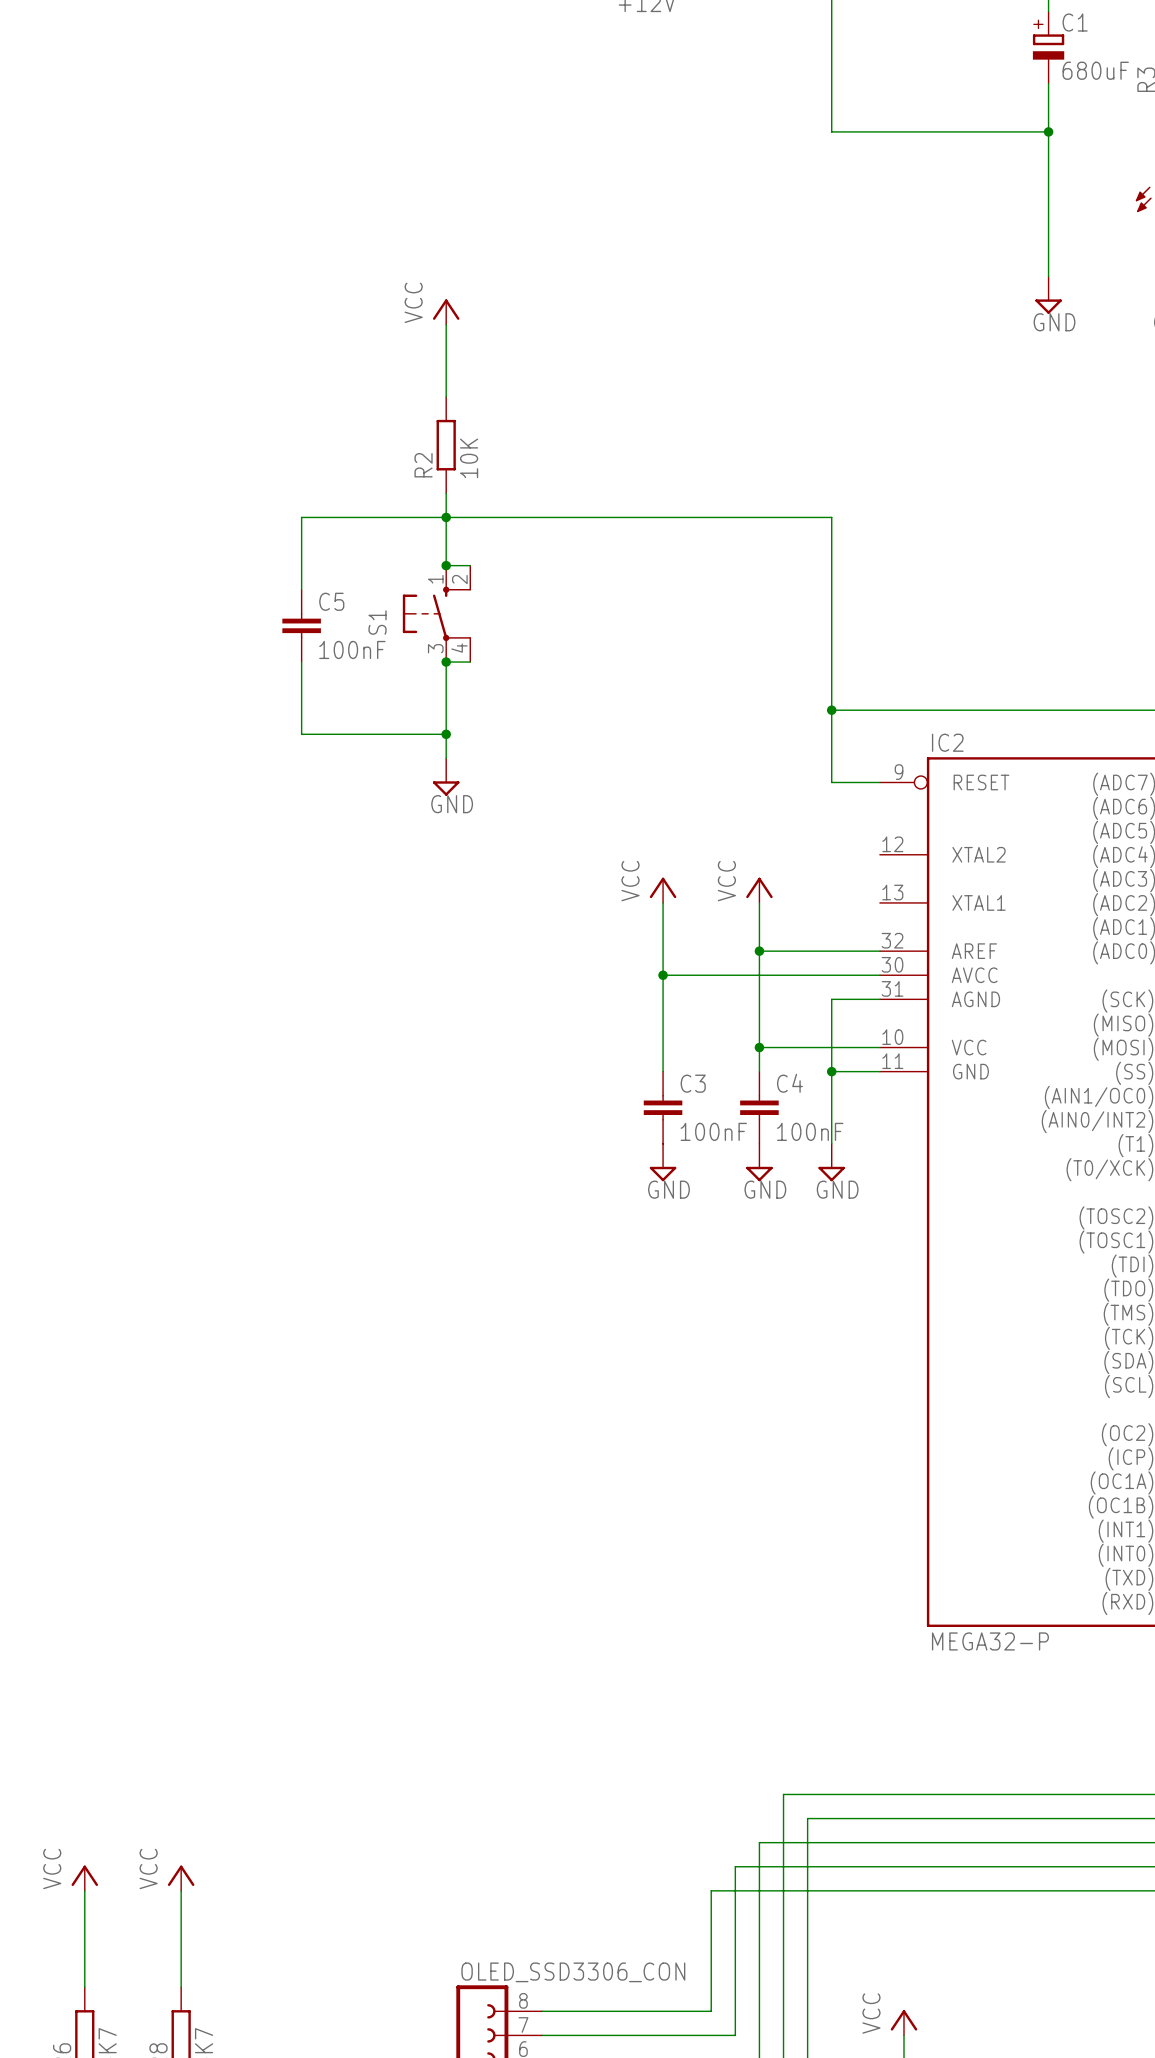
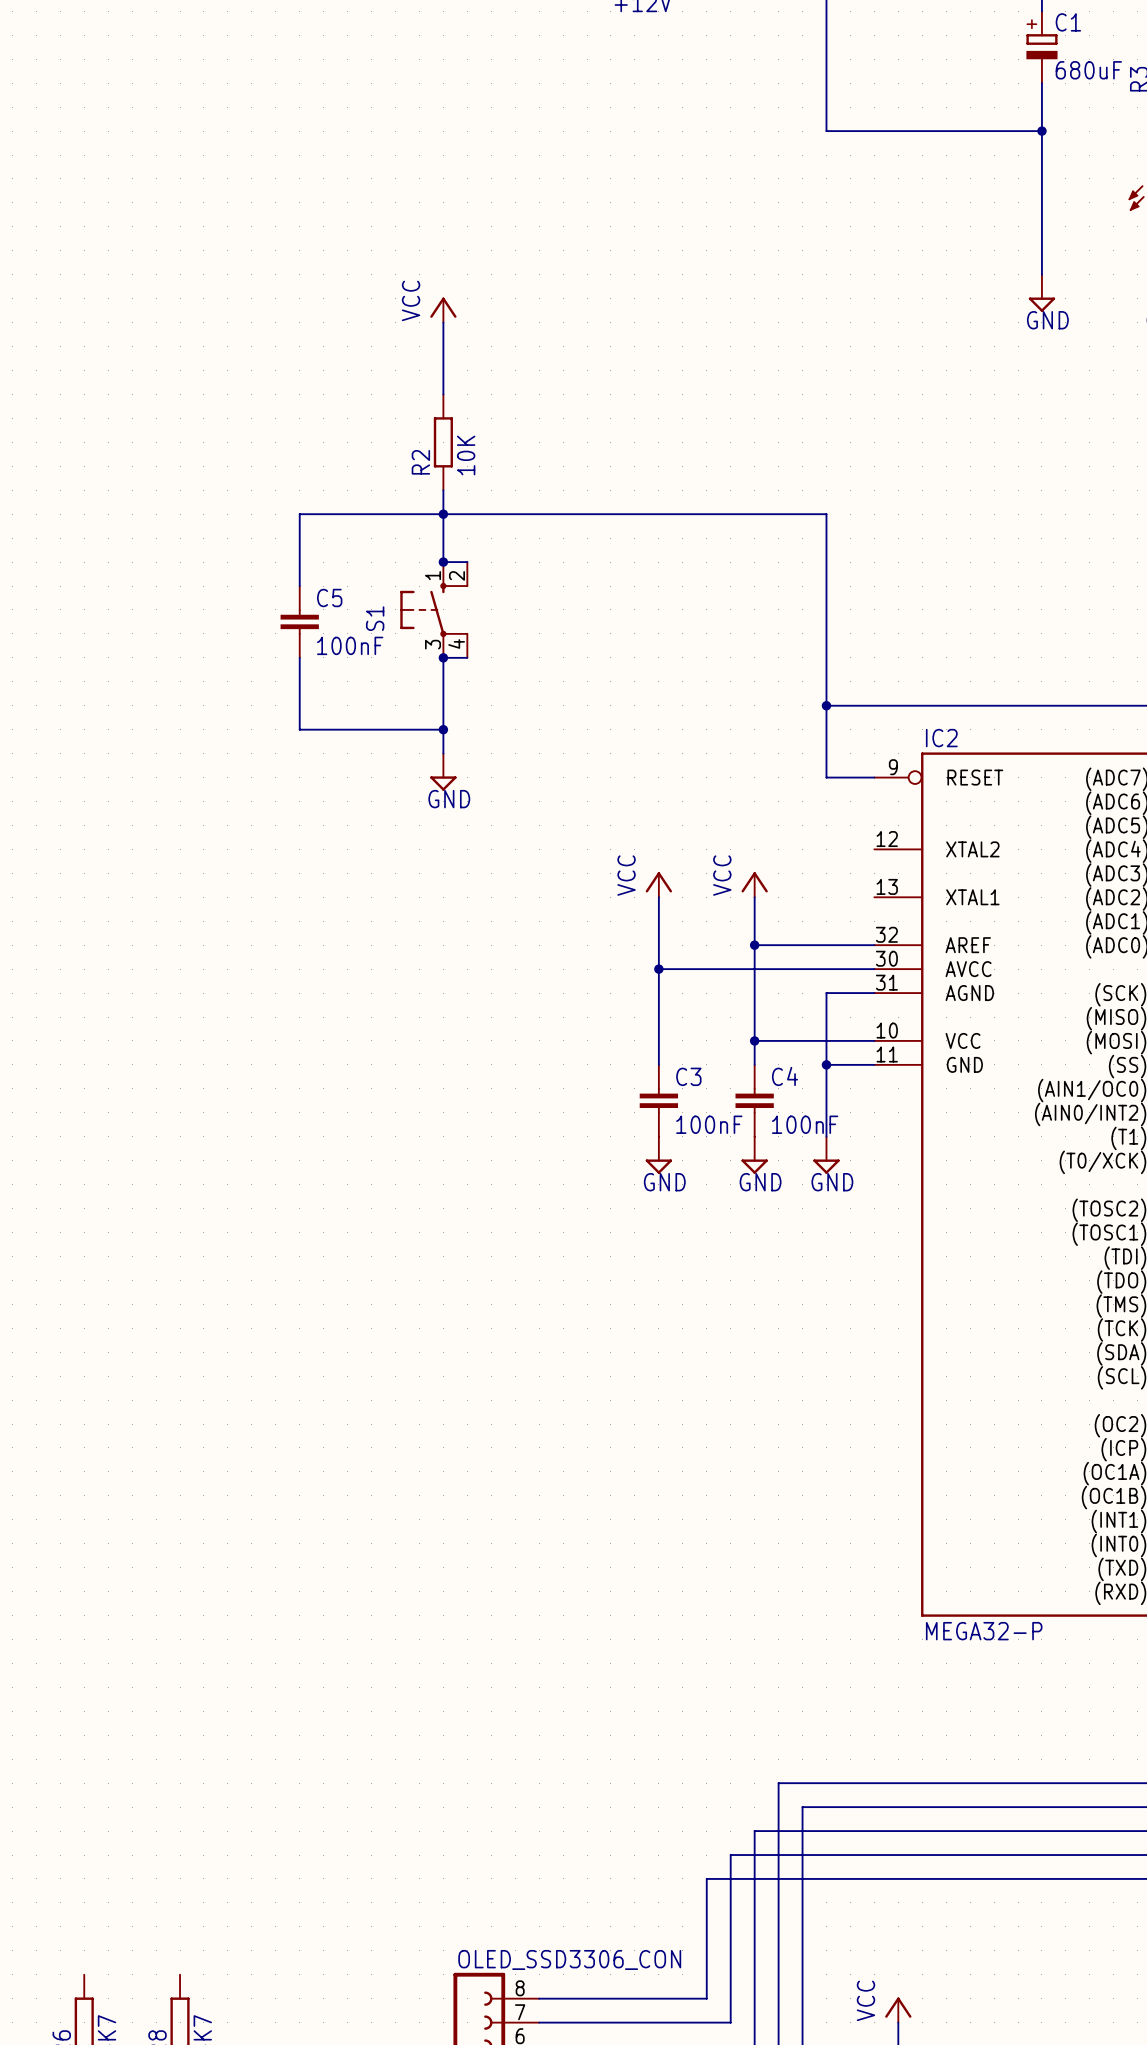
power symbol: VCC (84, 1878) -> none
power symbol: VCC (181, 1878) -> none
wire: (84, 1890) (84, 1987) -> none
wire: (181, 1890) (181, 1987) -> none

